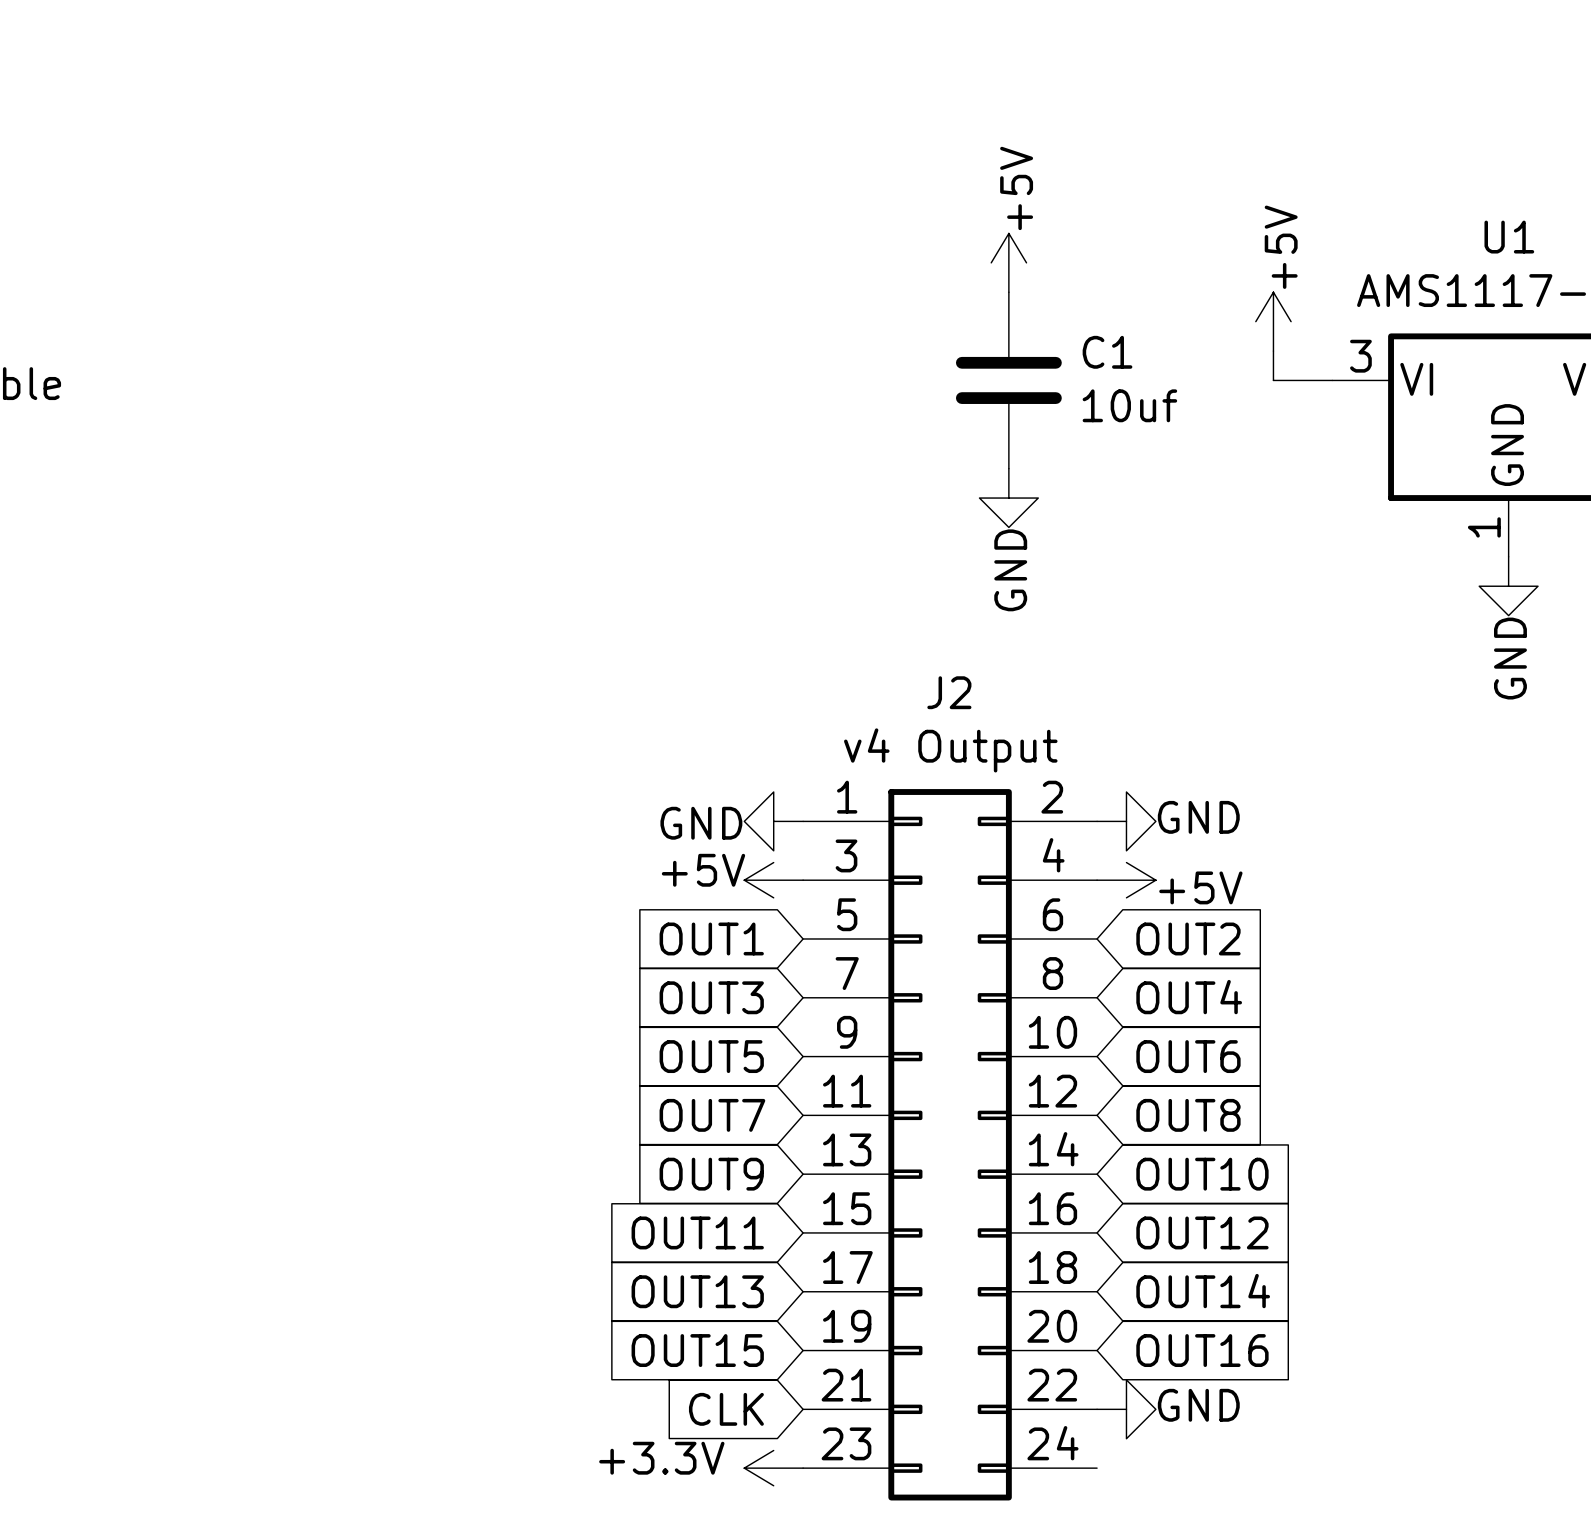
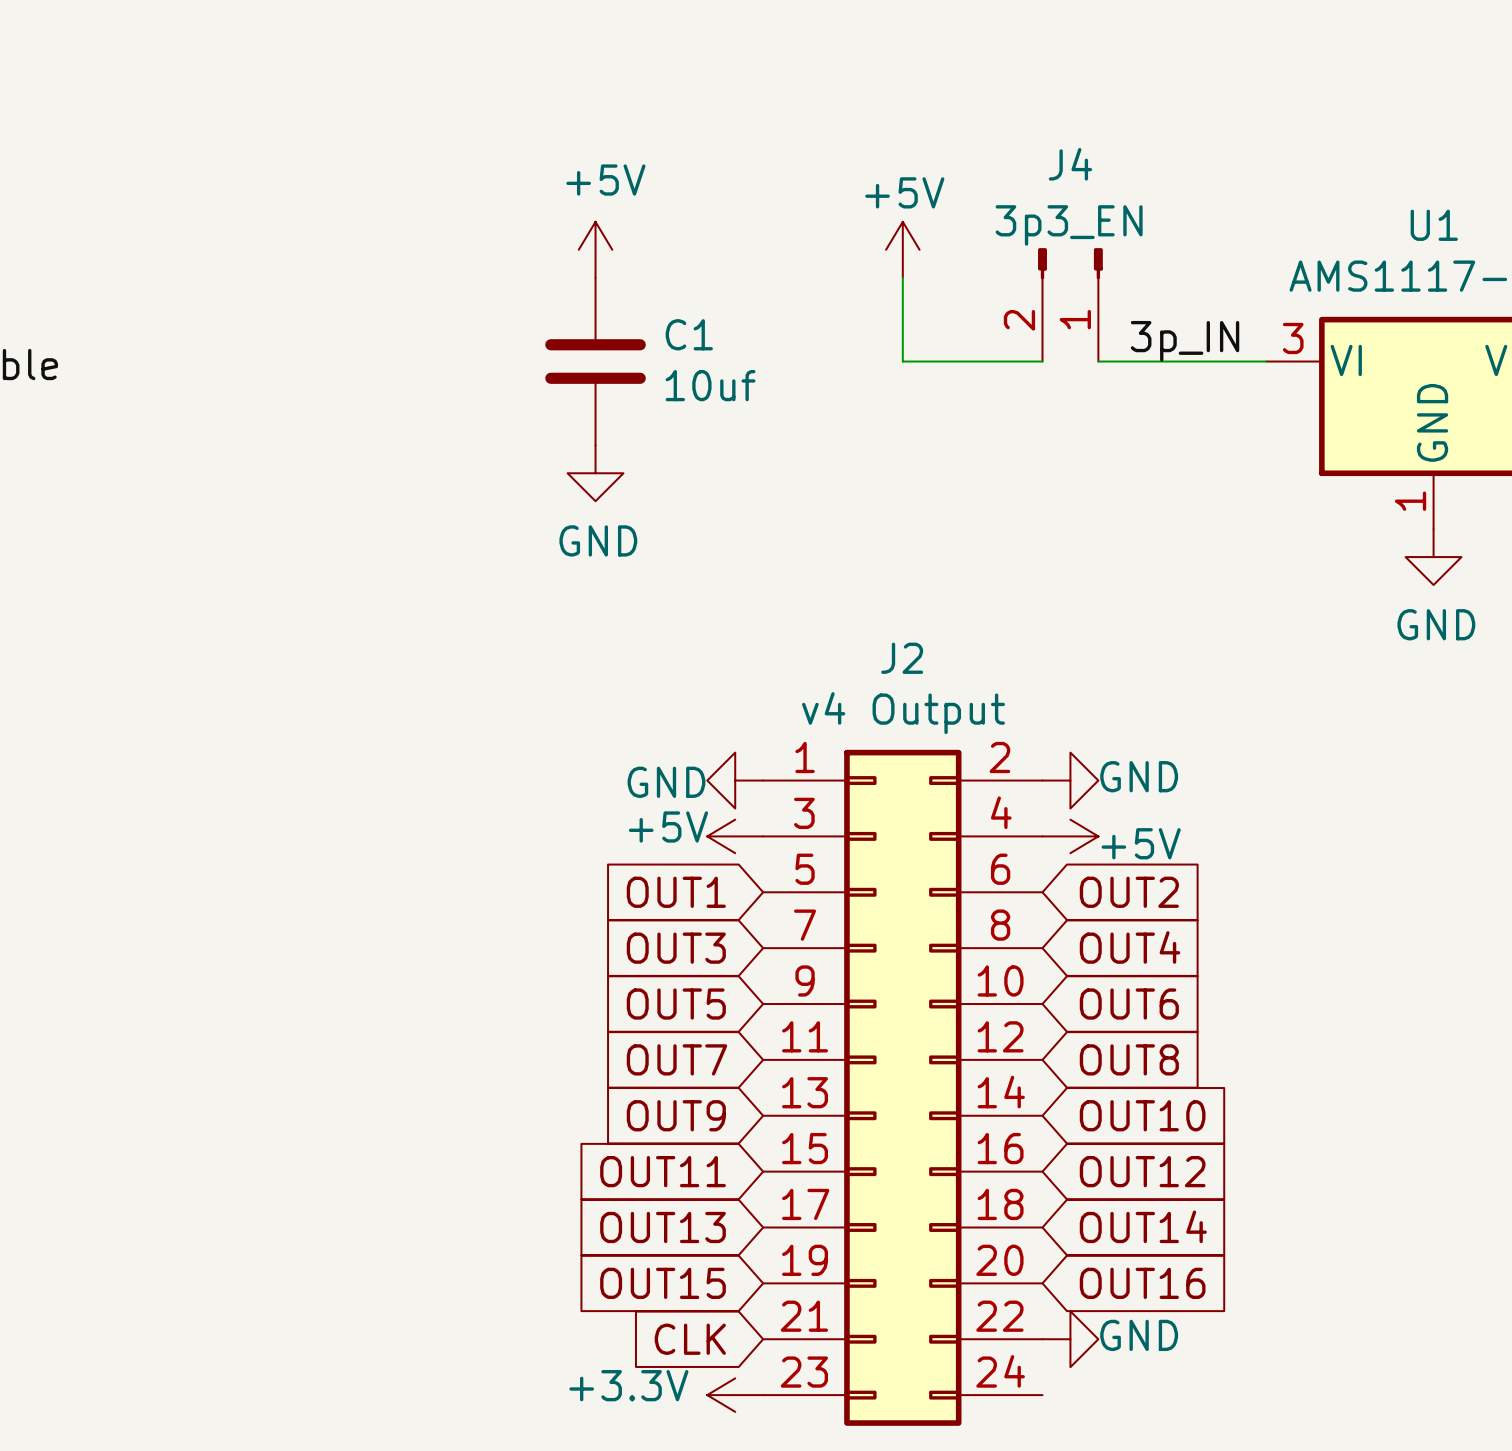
power symbol text rotation: 0° (1016, 188) -> 90° clockwise (904, 192)
power symbol: none -> +5V (595, 249)
power symbol position: +5V (1008, 262) -> +5V (902, 249)
wire: none -> (902, 277) (902, 361) (1042, 361)
J4: none -> 3p3_EN (1070, 304)
power symbol: +5V (1273, 321) -> none
wire: (1273, 351) (1273, 380) -> (1098, 361) (1210, 361)
label: none -> 3p_IN (1185, 341)
C1 position: (1008, 380) -> (595, 361)
power symbol position: GND (1008, 498) -> GND (595, 473)
power symbol text rotation: 0° (1010, 570) -> 90° clockwise (598, 540)
power symbol text rotation: 0° (1510, 658) -> 90° clockwise (1436, 624)

